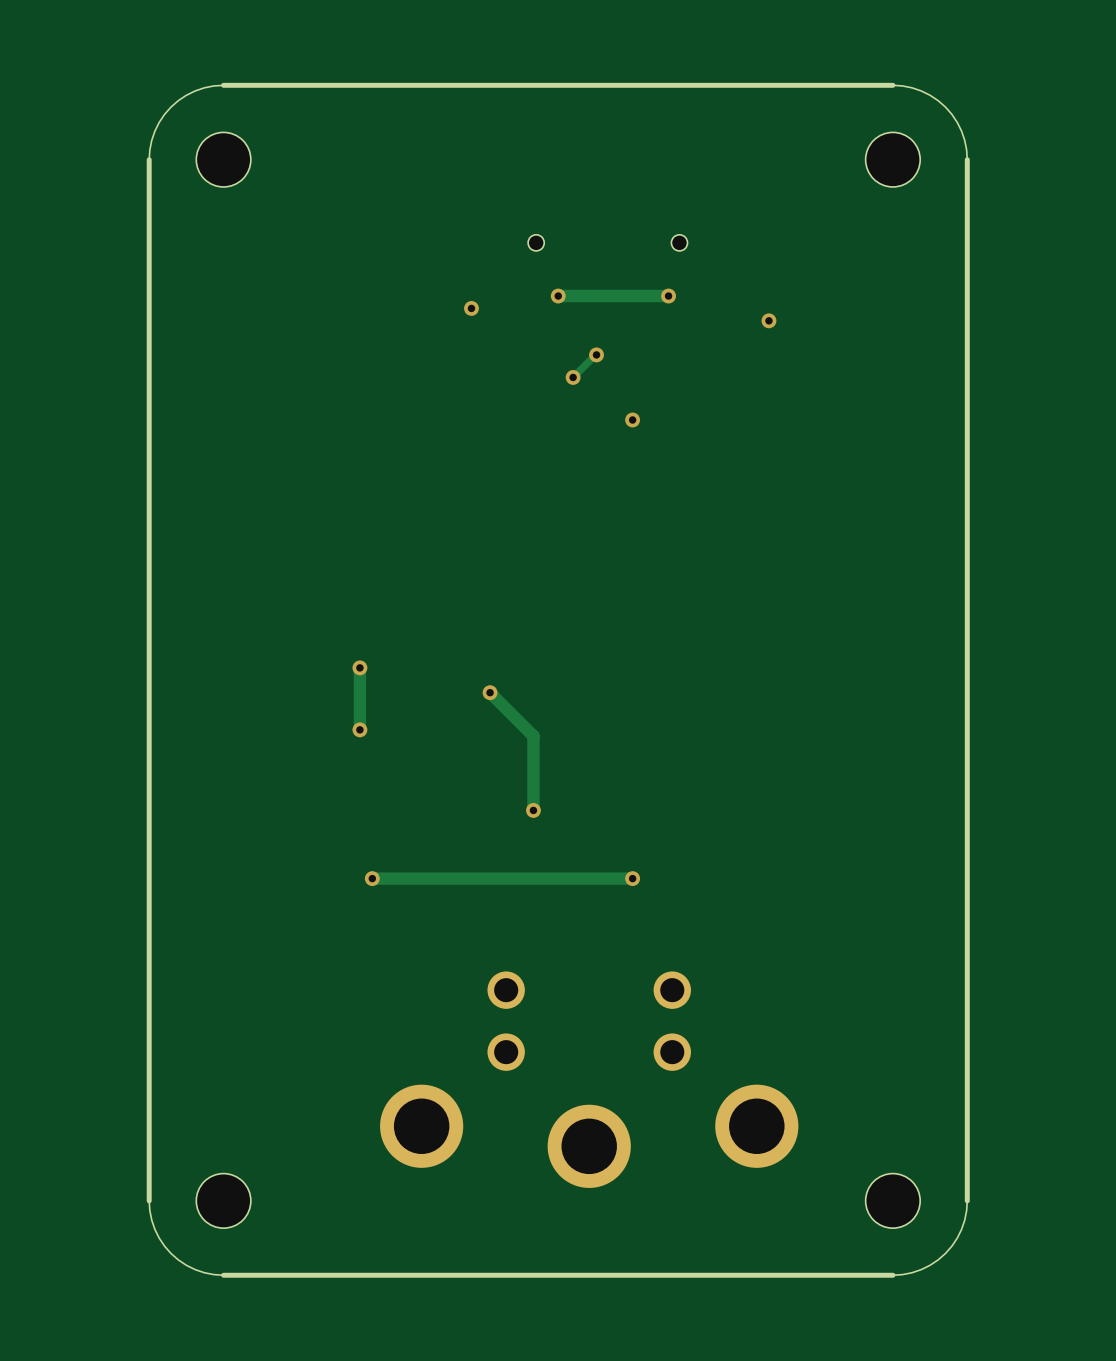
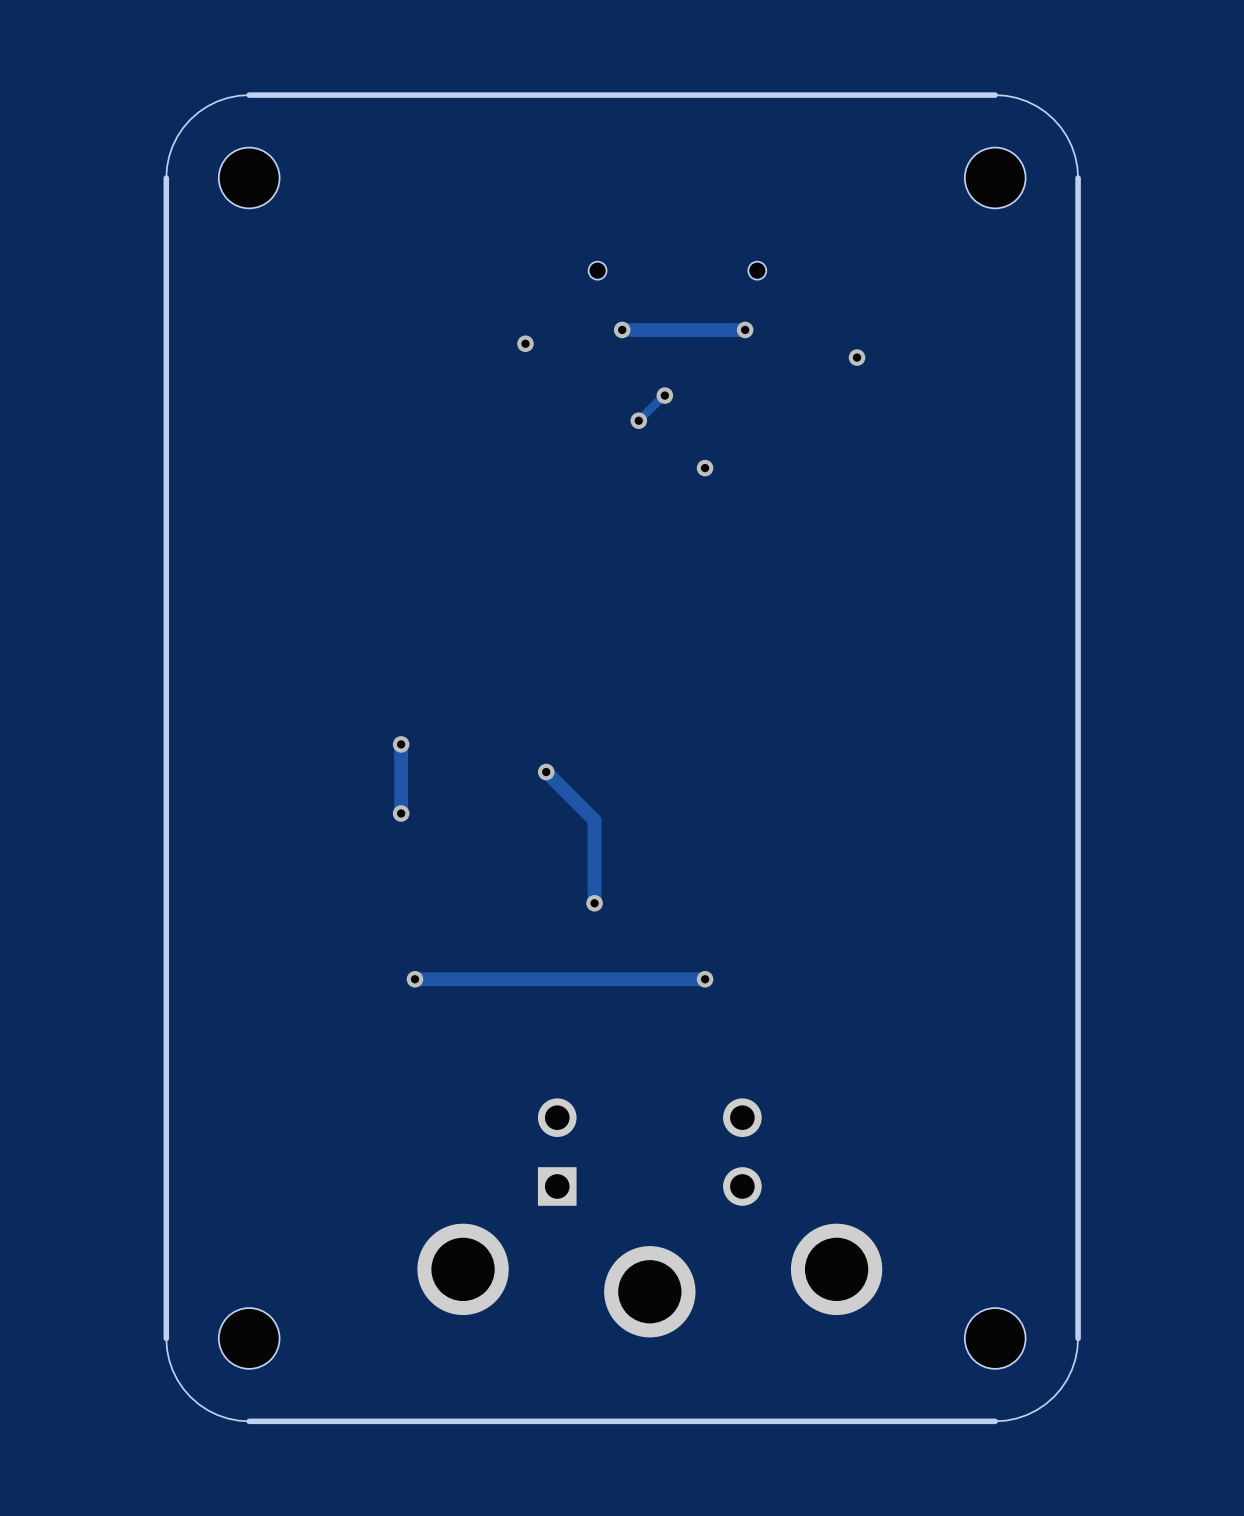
part footprint: [380, 971, 799, 1188] -> [417, 1098, 883, 1338]

